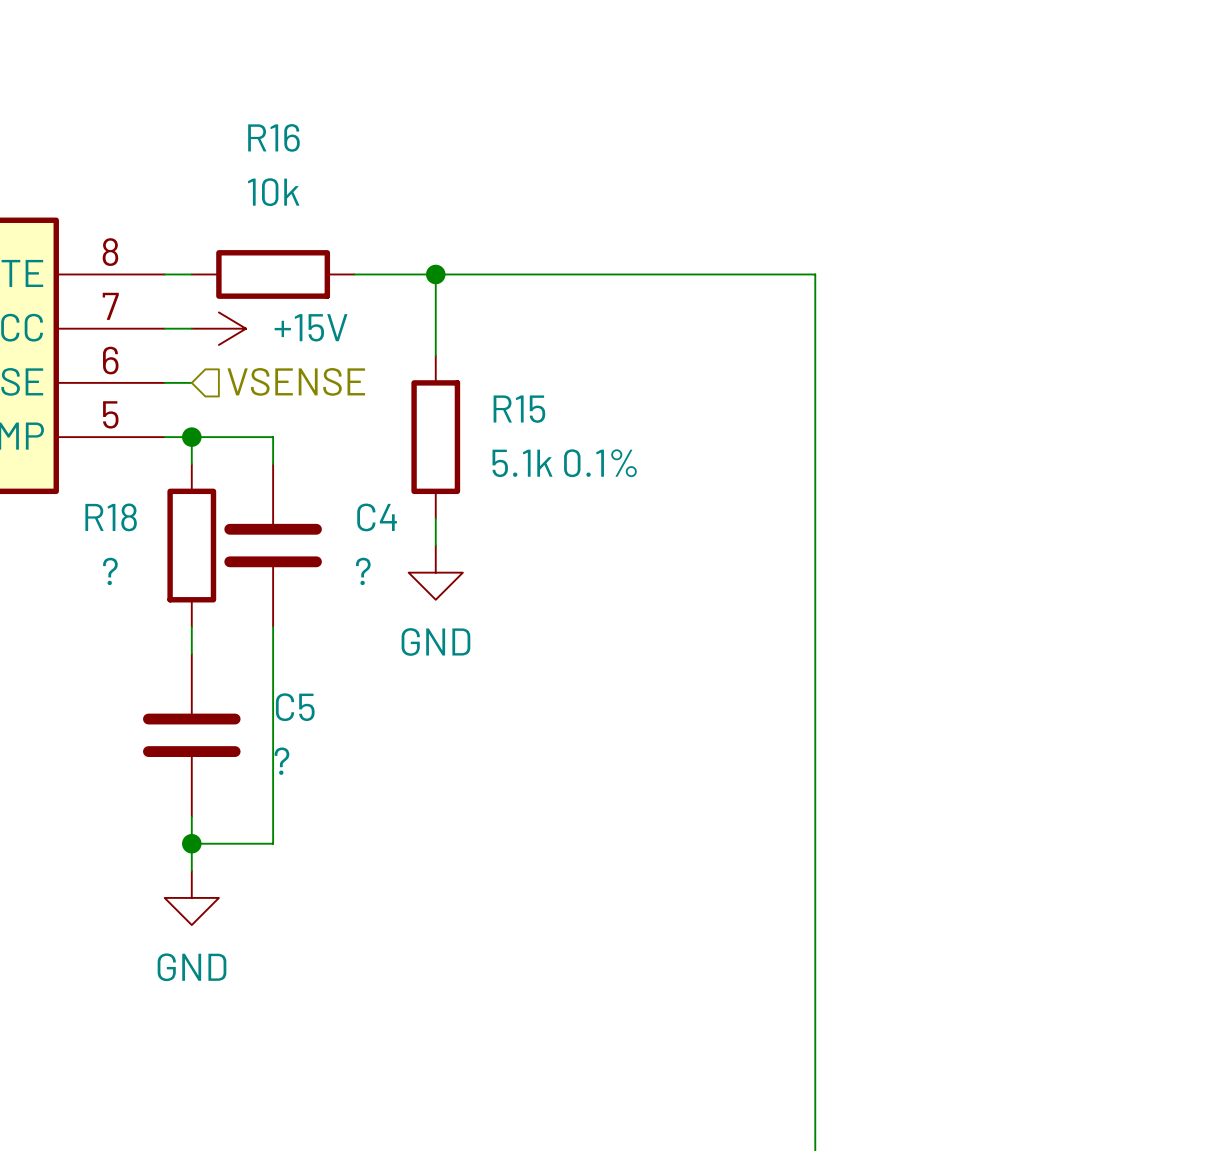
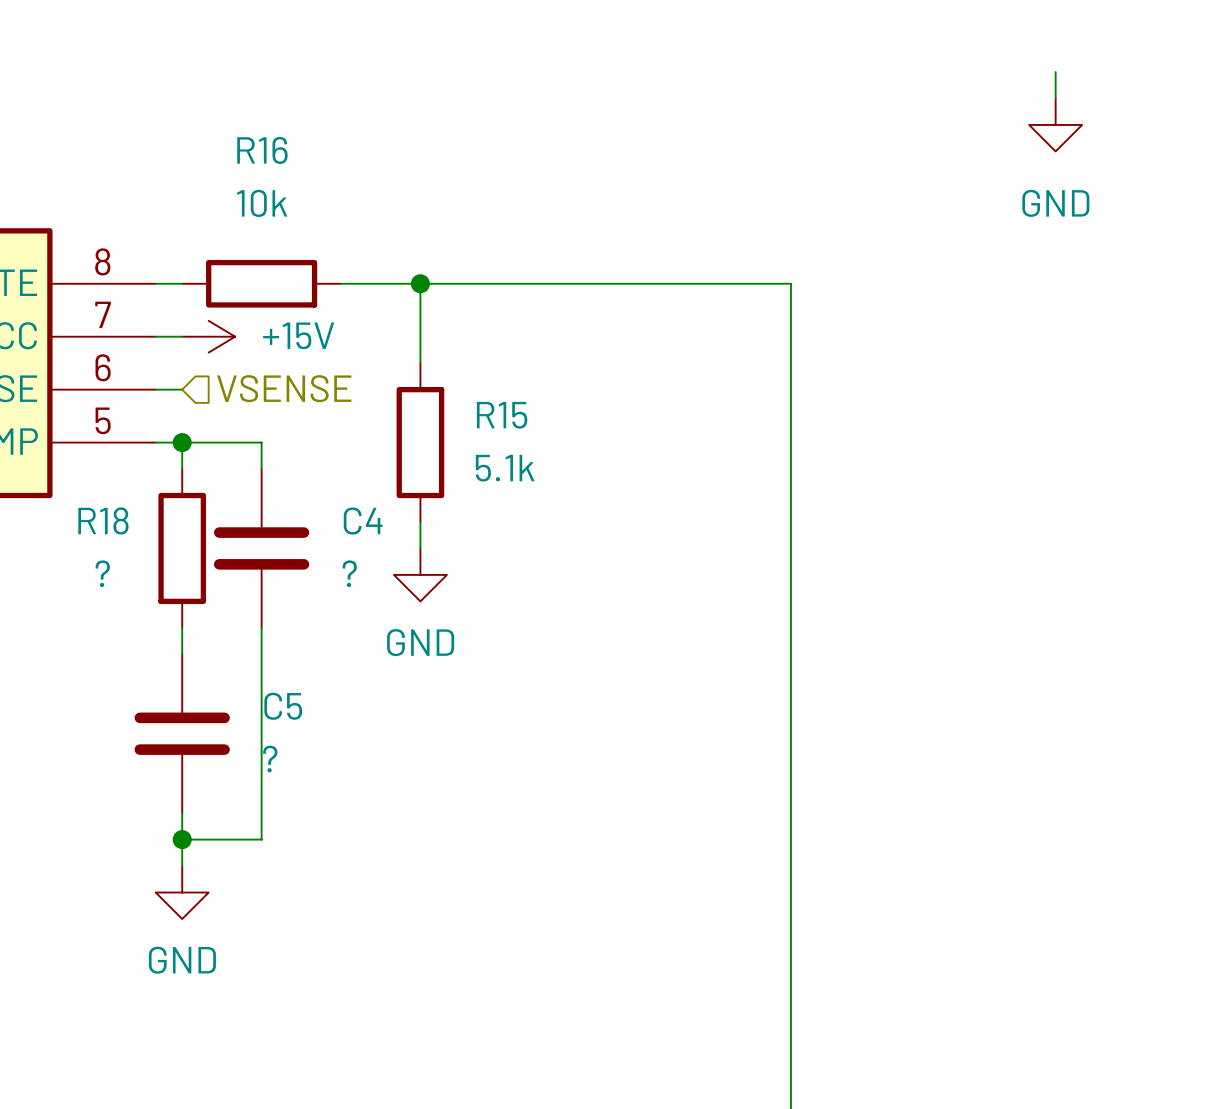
wire: none -> (1055, 72) (1055, 98)
power symbol: none -> GND (1055, 124)
R15 value: 5.1k 0.1% (564, 463) -> 5.1k (505, 468)

